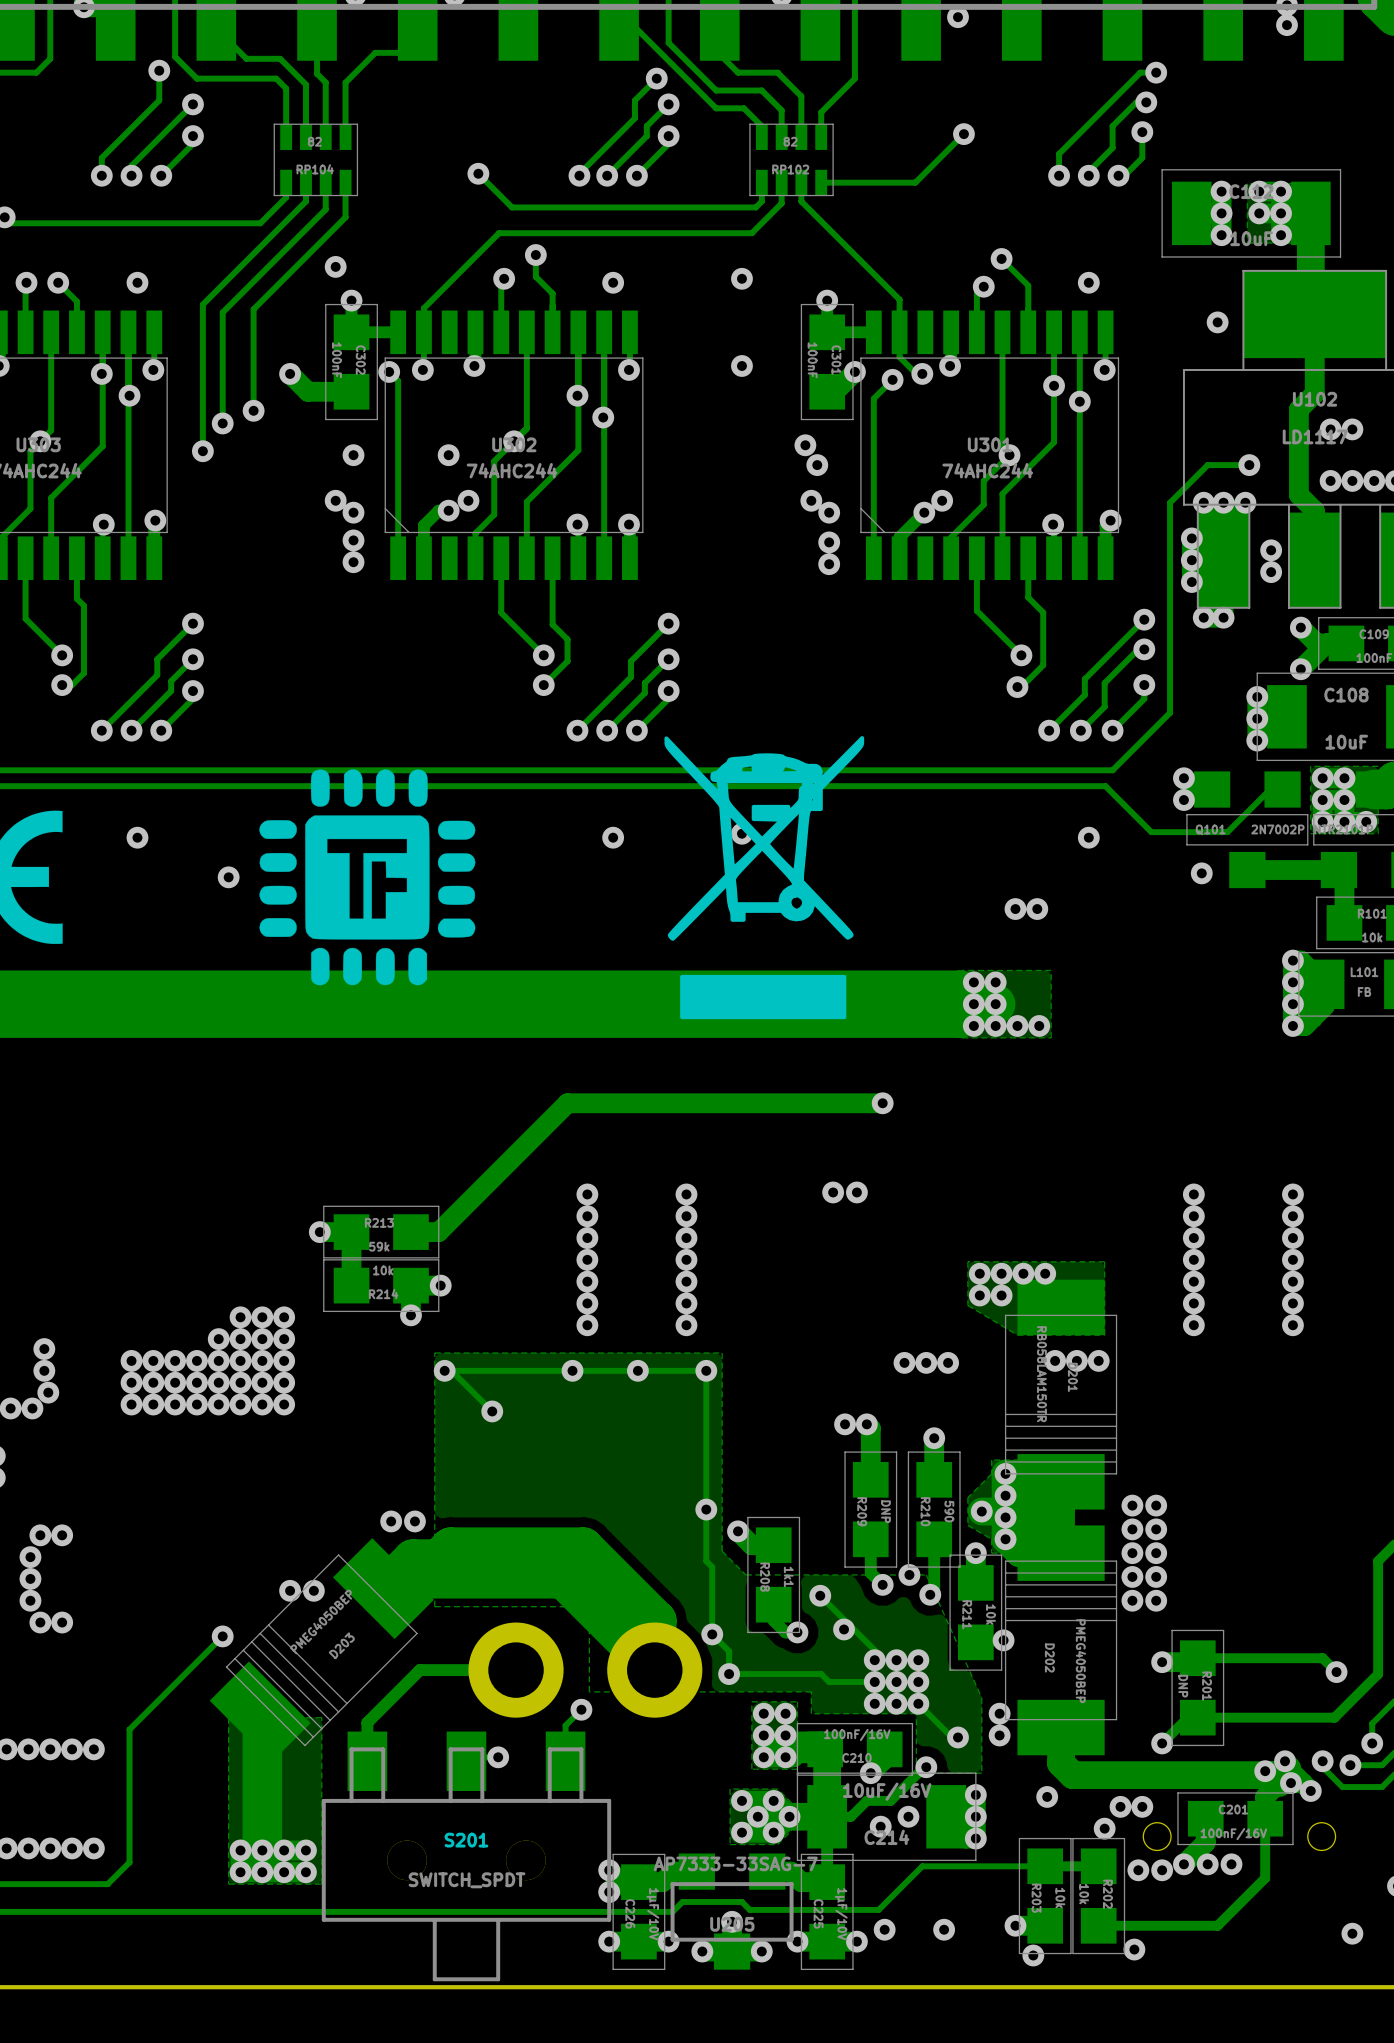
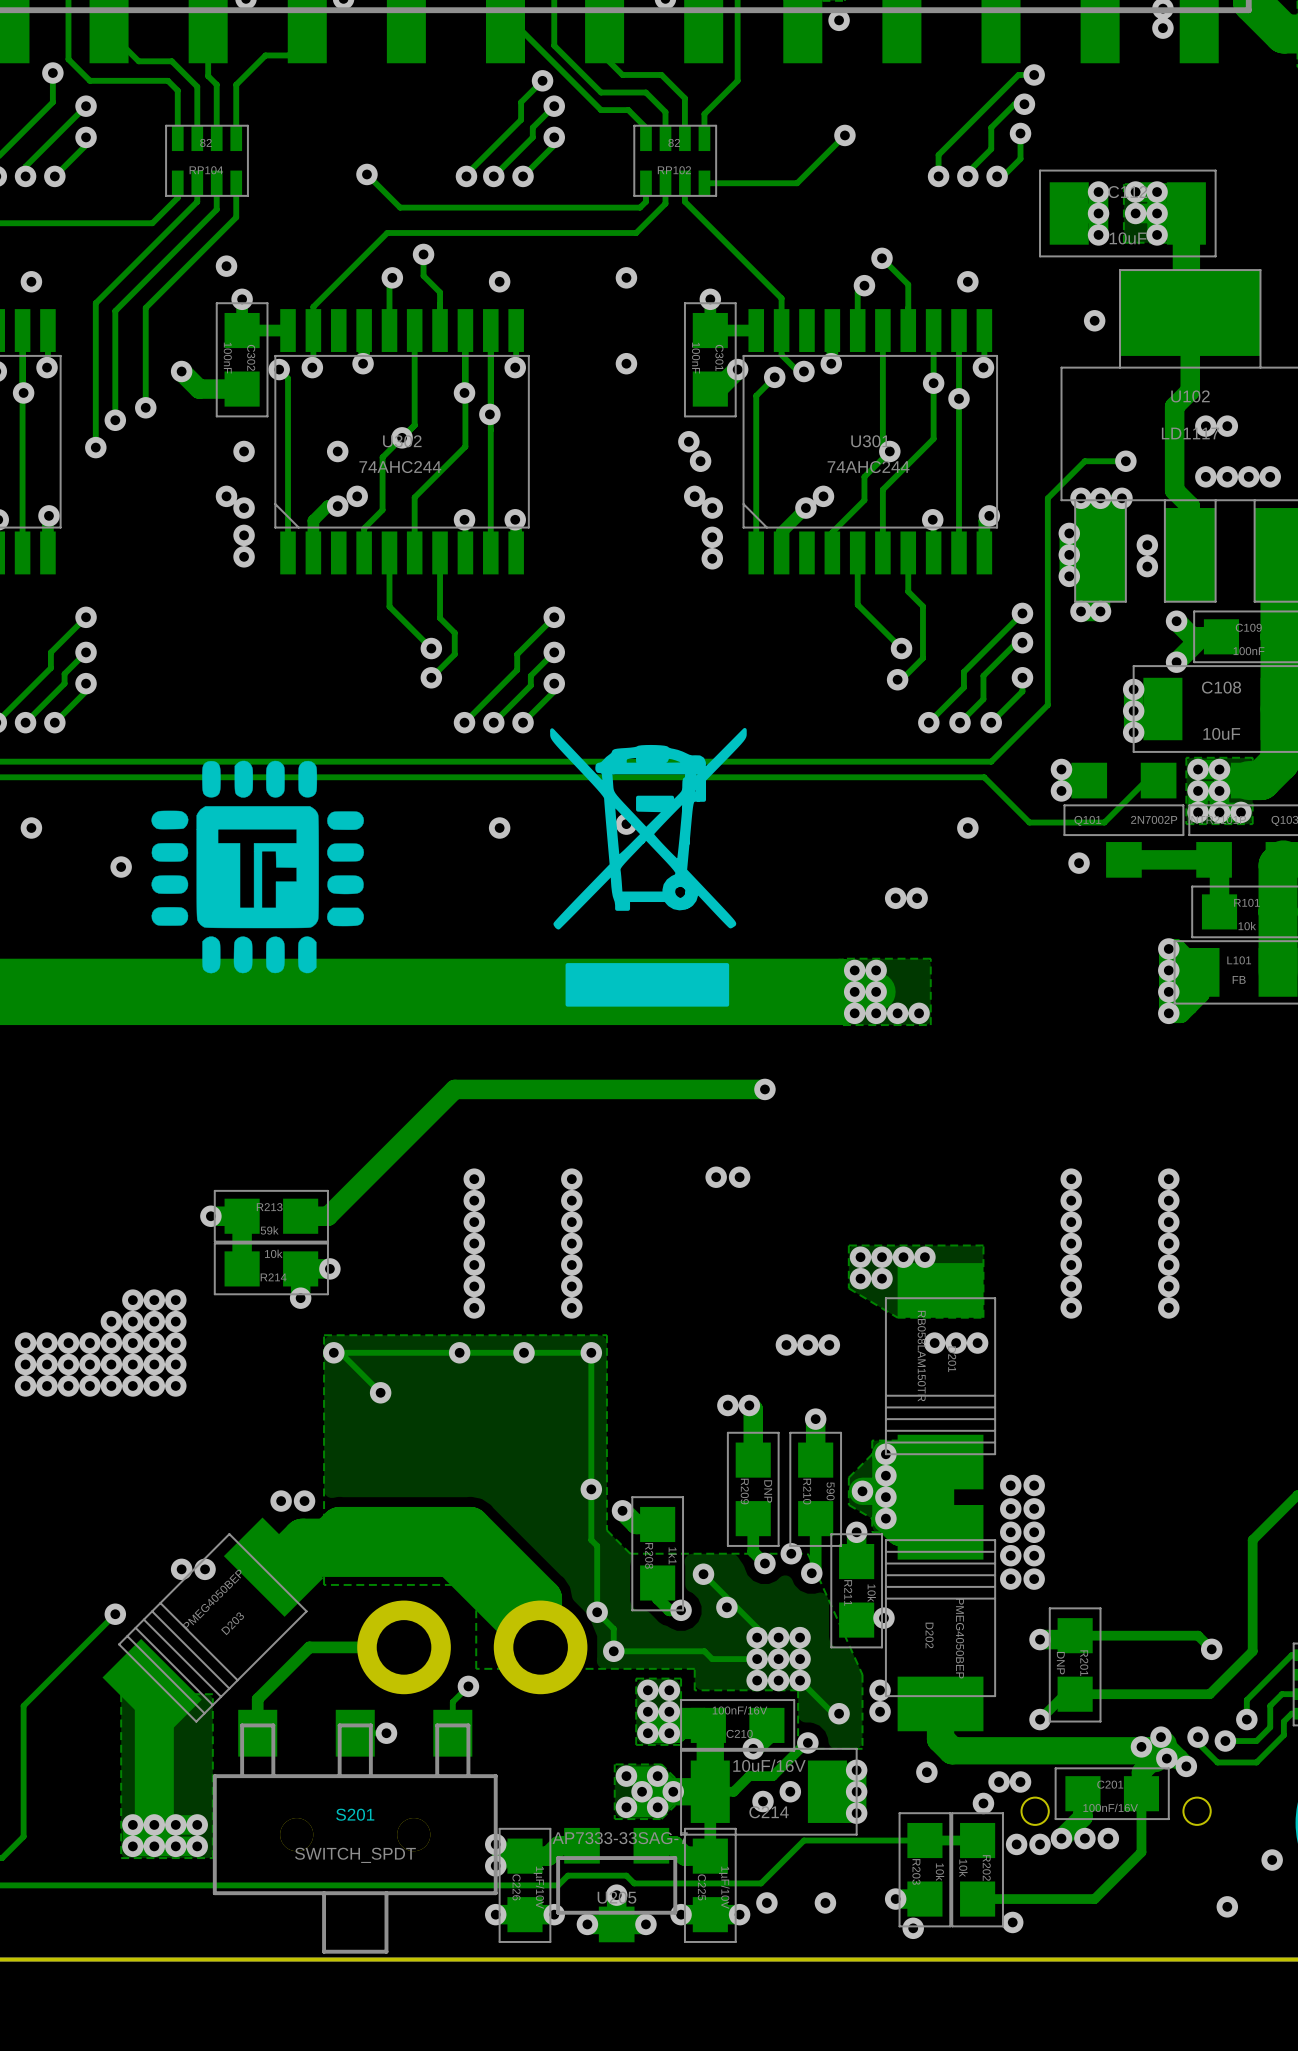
S201 footprint: [321, 1731, 612, 1982] -> [212, 1709, 498, 1954]

